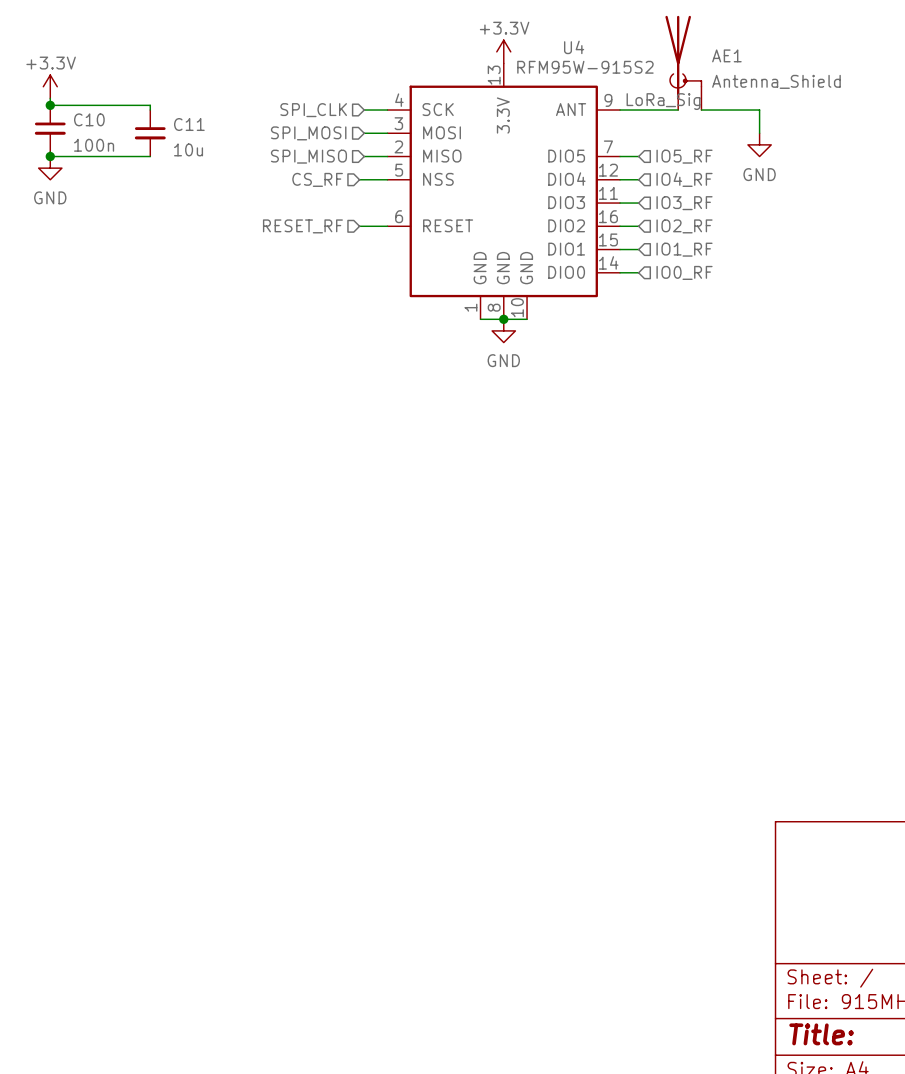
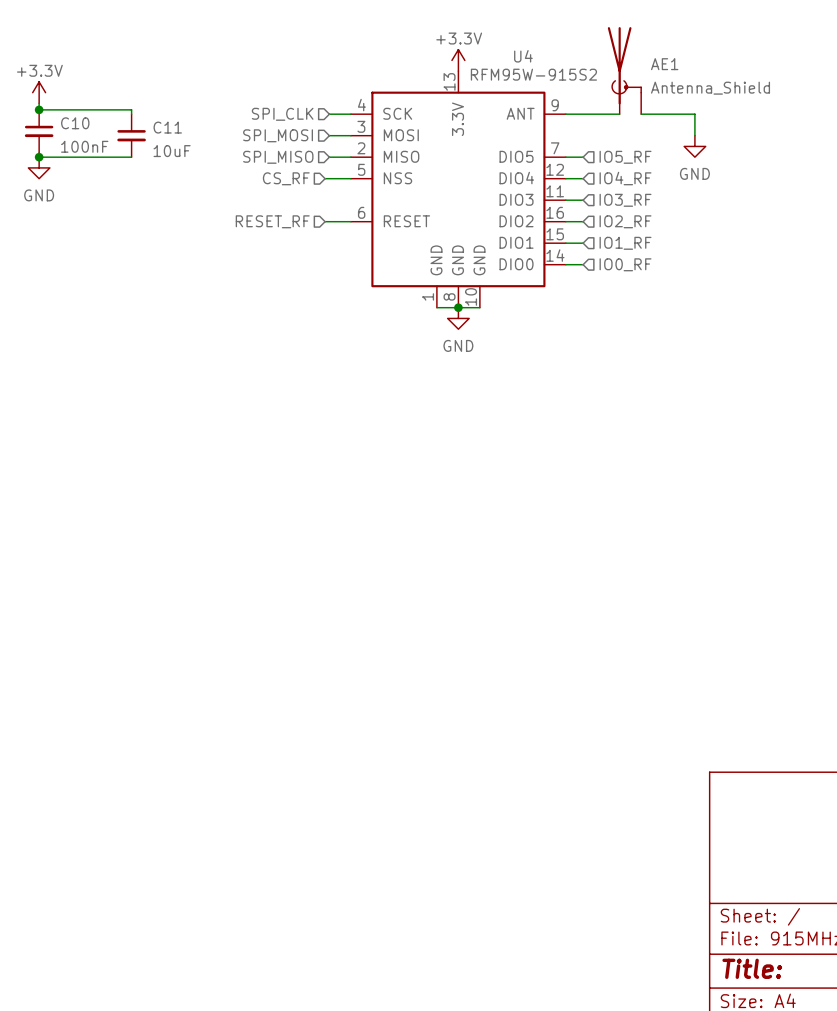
label: LoRa_Sig (663, 101) -> none
C10 value: 100n (94, 145) -> 100nF (84, 146)
C11 value: 10u (188, 149) -> 10uF (172, 151)

